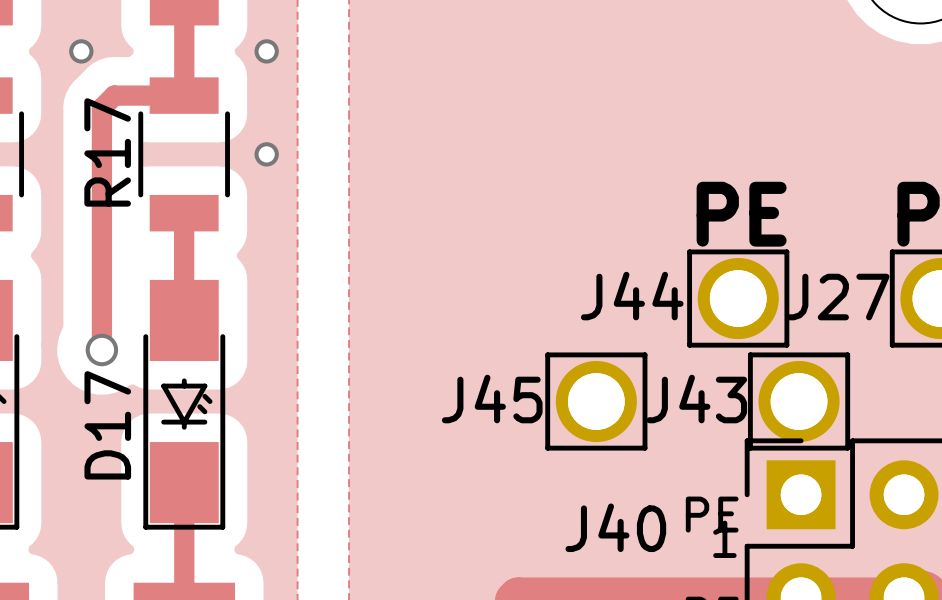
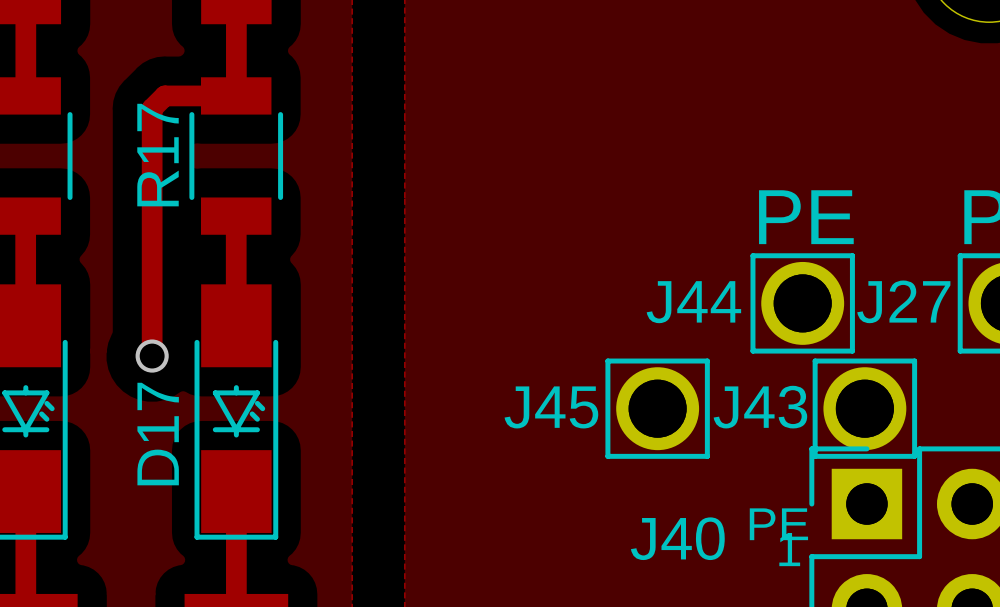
via: (81, 51) -> none
via: (266, 51) -> none
via: (266, 154) -> none

